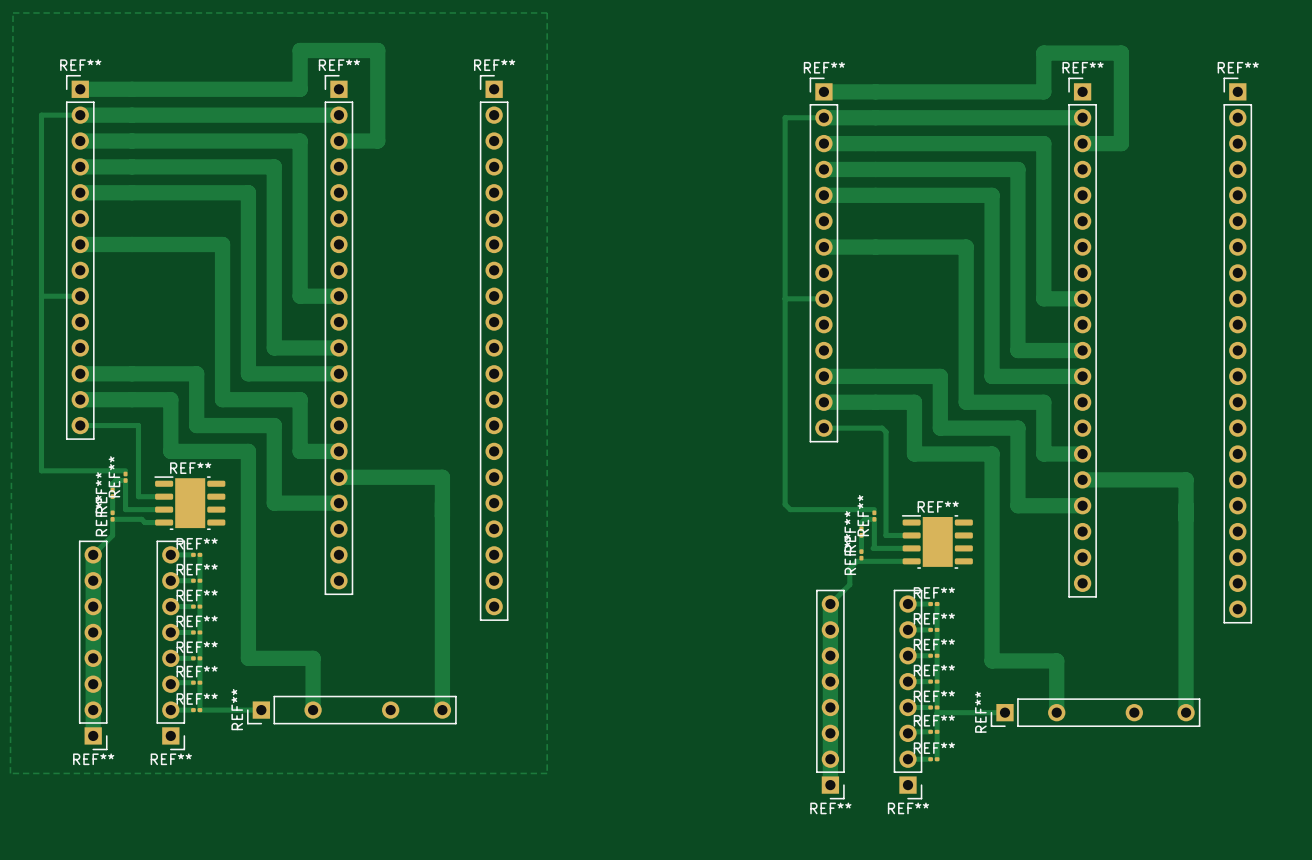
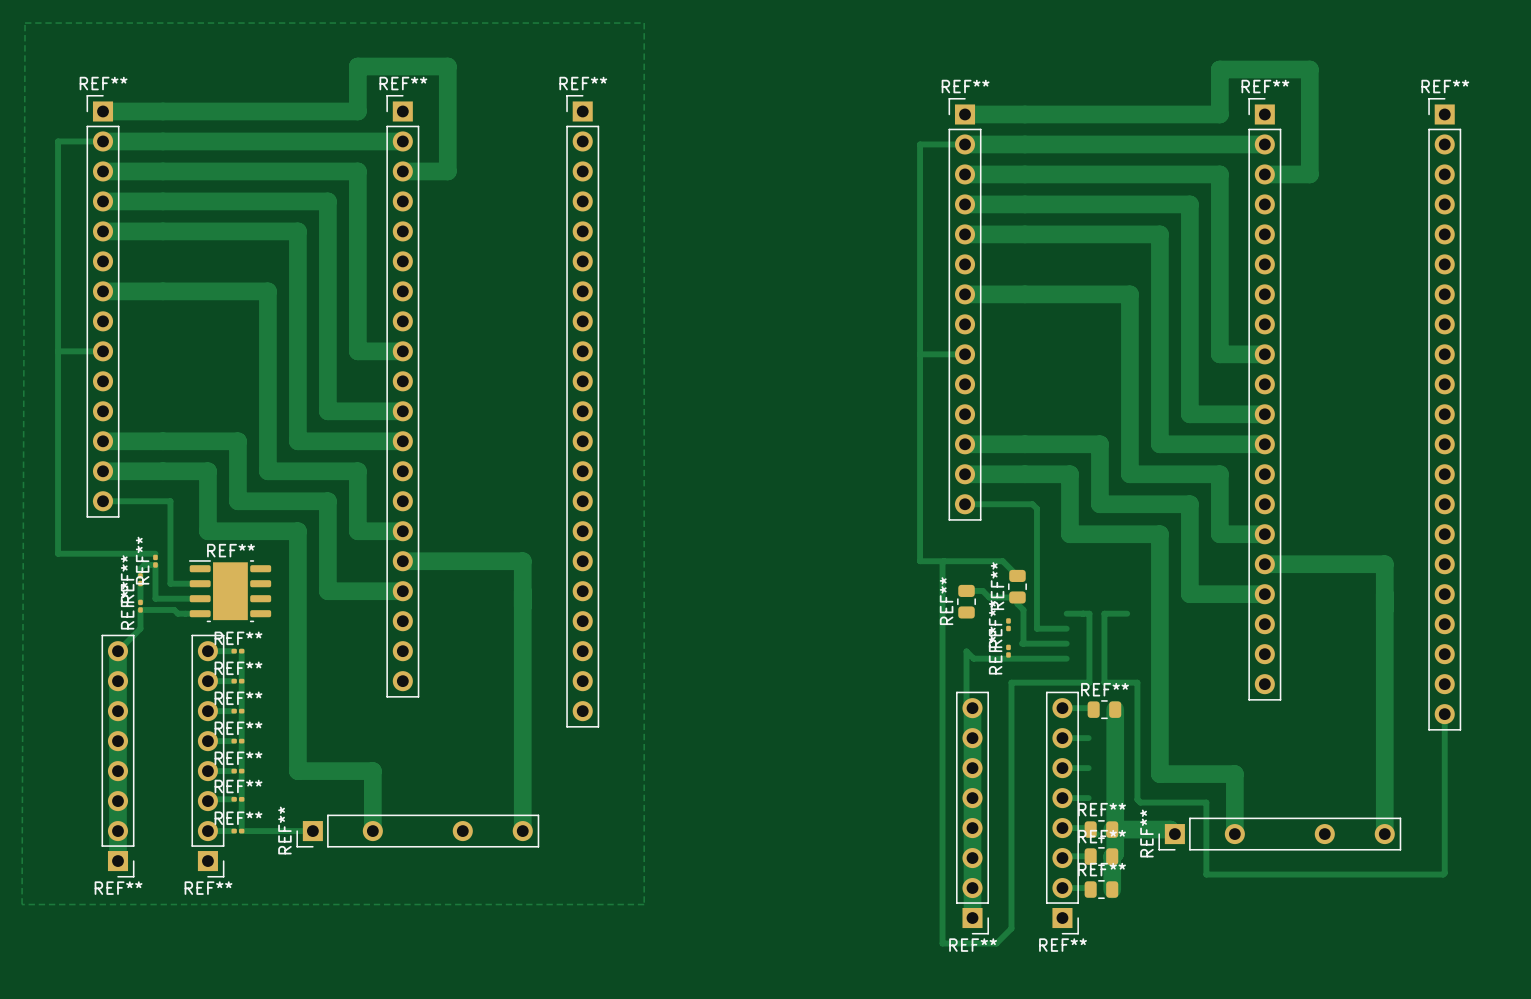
track: (785, 477) (785, 504) (790, 509) (874, 509) -> (920, 561) (1002, 561) (1017, 575)
track: none -> (944, 561) (942, 943) (996, 943) (1011, 928) (1011, 682) (1089, 682) (1089, 613) (1066, 613)
REF**: none -> (1017, 586)
REF**: none -> (966, 601)
REF**: (874, 516) -> none
track: (874, 519) (864, 519) (861, 522) (861, 529) -> (1023, 609) (1017, 603) (1017, 597) (989, 597) (982, 590) (966, 590)
track: none -> (1127, 613) (1104, 613) (1104, 682) (1137, 682) (1137, 799) (1140, 802) (1206, 802) (1206, 874) (1443, 874) (1444, 714)
track: (861, 535) (861, 551) -> none
REF**: (937, 541) -> none
track: (856, 561) (849, 568) (849, 584) (830, 604) -> (1003, 658) (973, 658) (966, 651) (966, 702) (972, 708)
REF**: (933, 604) -> none
track: (937, 604) (937, 759) -> none
REF**: none -> (1104, 709)
track: none -> (1115, 709) (1115, 853) (1112, 856) (1112, 889)
REF**: (933, 629) -> none
REF**: (933, 655) -> none
REF**: (933, 681) -> none
REF** footprint: [928, 705, 940, 710] -> [1084, 820, 1119, 839]
track: (937, 712) (1004, 712) -> (1112, 829) (1170, 829) (1174, 834)
REF** footprint: [928, 729, 940, 734] -> [1084, 847, 1119, 866]
REF** footprint: [928, 757, 940, 762] -> [1084, 880, 1119, 899]

